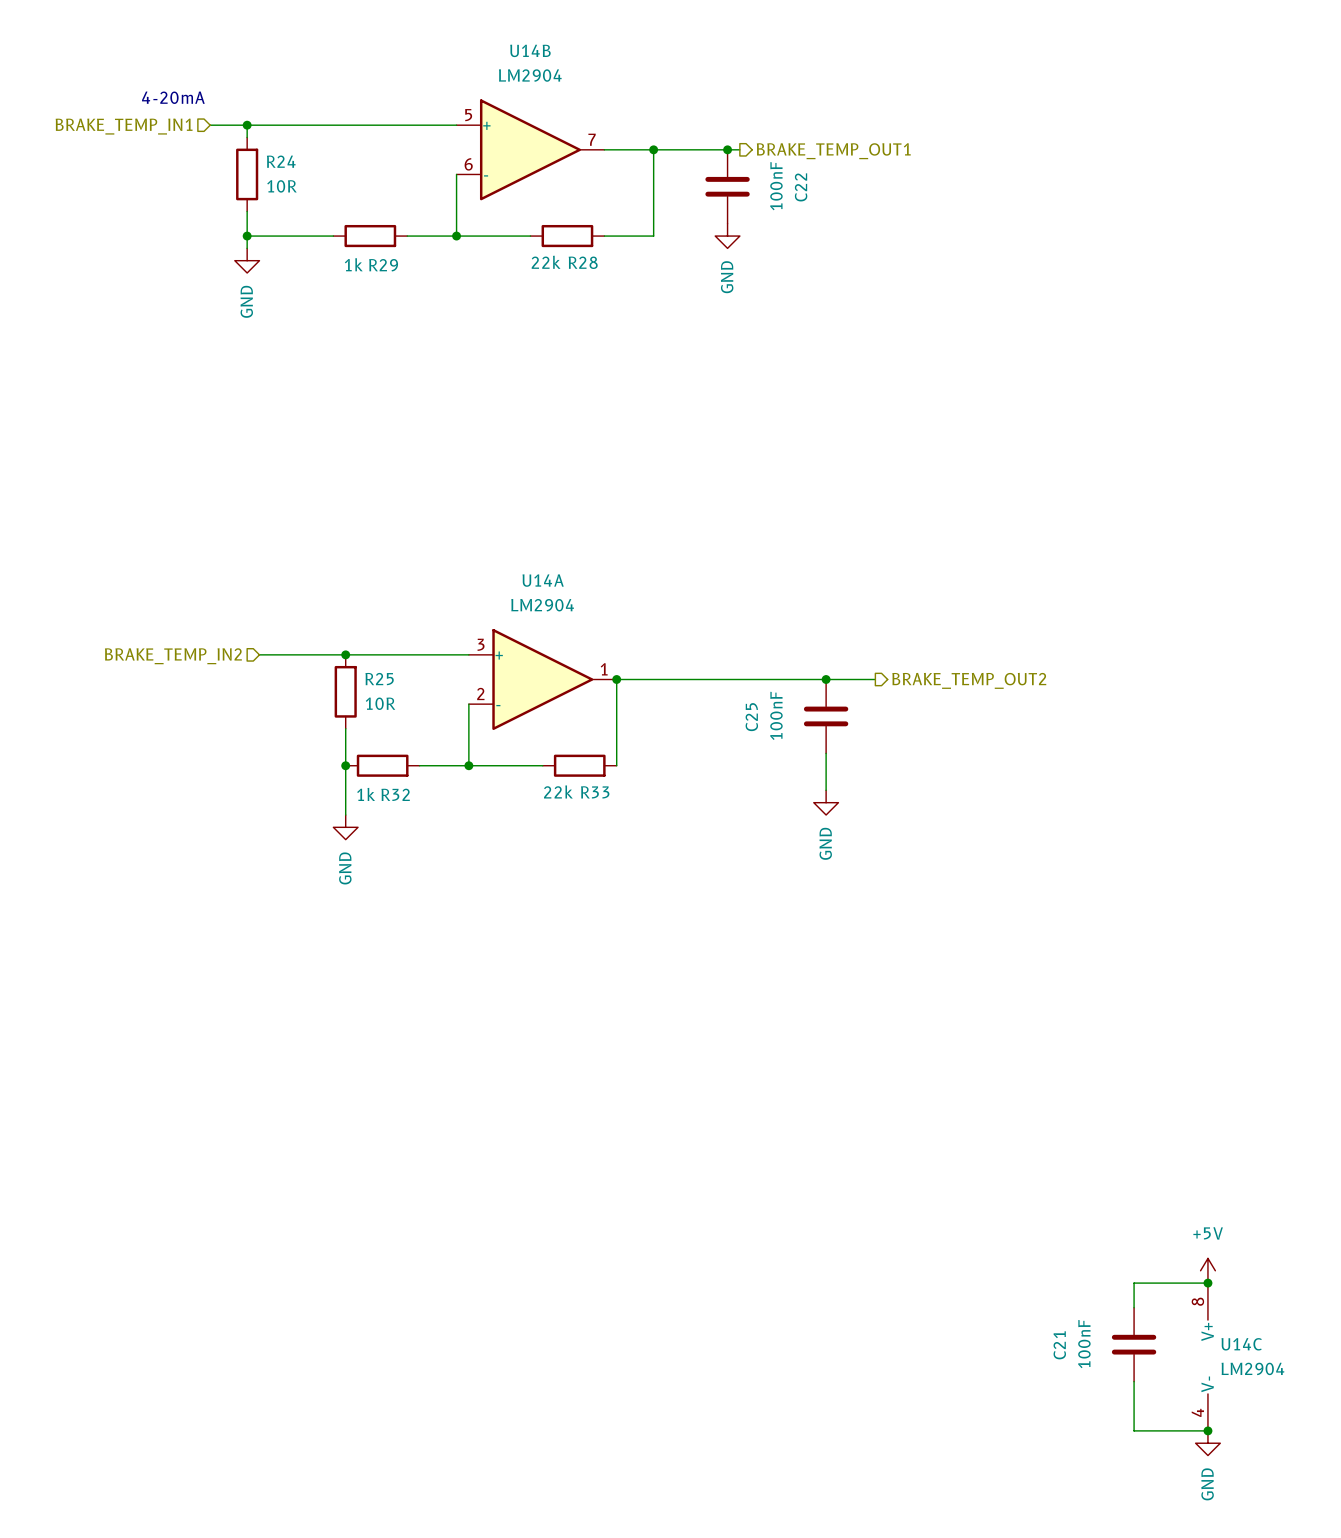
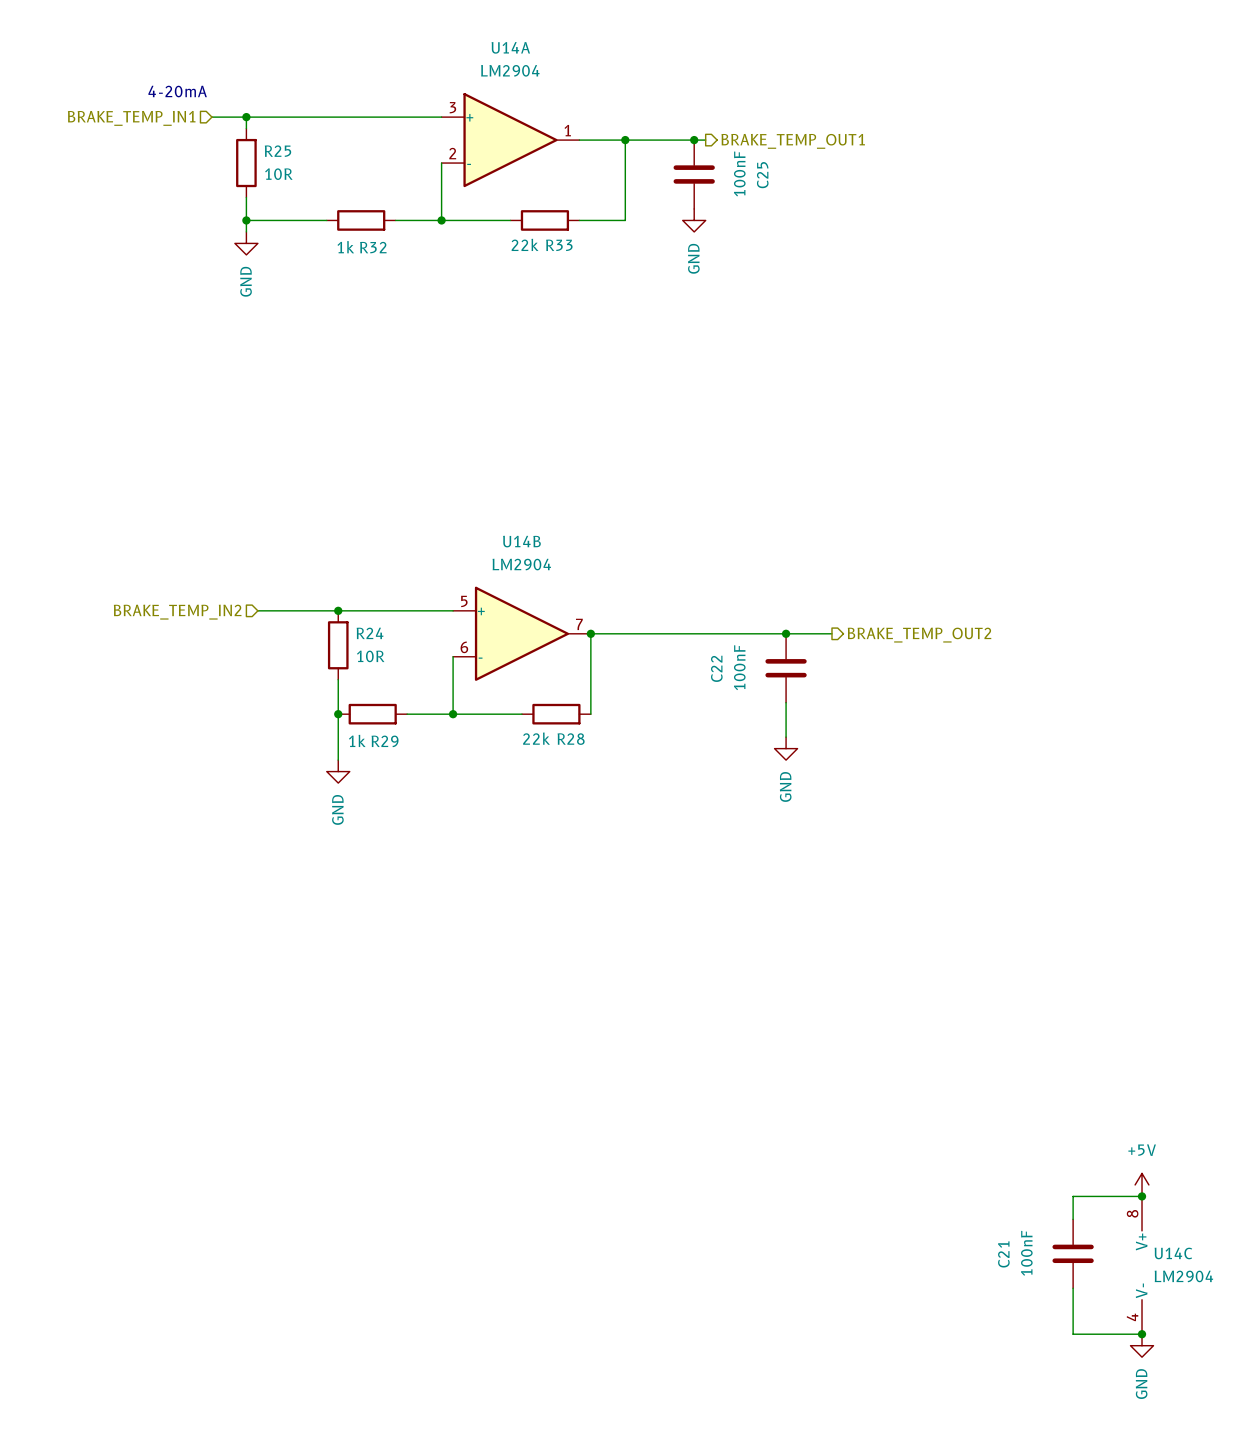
U14B position: (530, 149) -> (521, 633)
R24 name: R24 (281, 161) -> R25 (277, 151)
C22 name: C22 (801, 187) -> C25 (762, 175)
R28 name: R28 (583, 262) -> R33 (559, 245)
R29 name: R29 (383, 265) -> R32 (373, 247)
R25 name: R25 (379, 679) -> R24 (370, 633)
U14A position: (542, 679) -> (510, 140)
C25 name: C25 (751, 717) -> C22 (716, 668)
R33 name: R33 (595, 792) -> R28 (571, 739)
R32 name: R32 (395, 794) -> R29 (385, 741)

